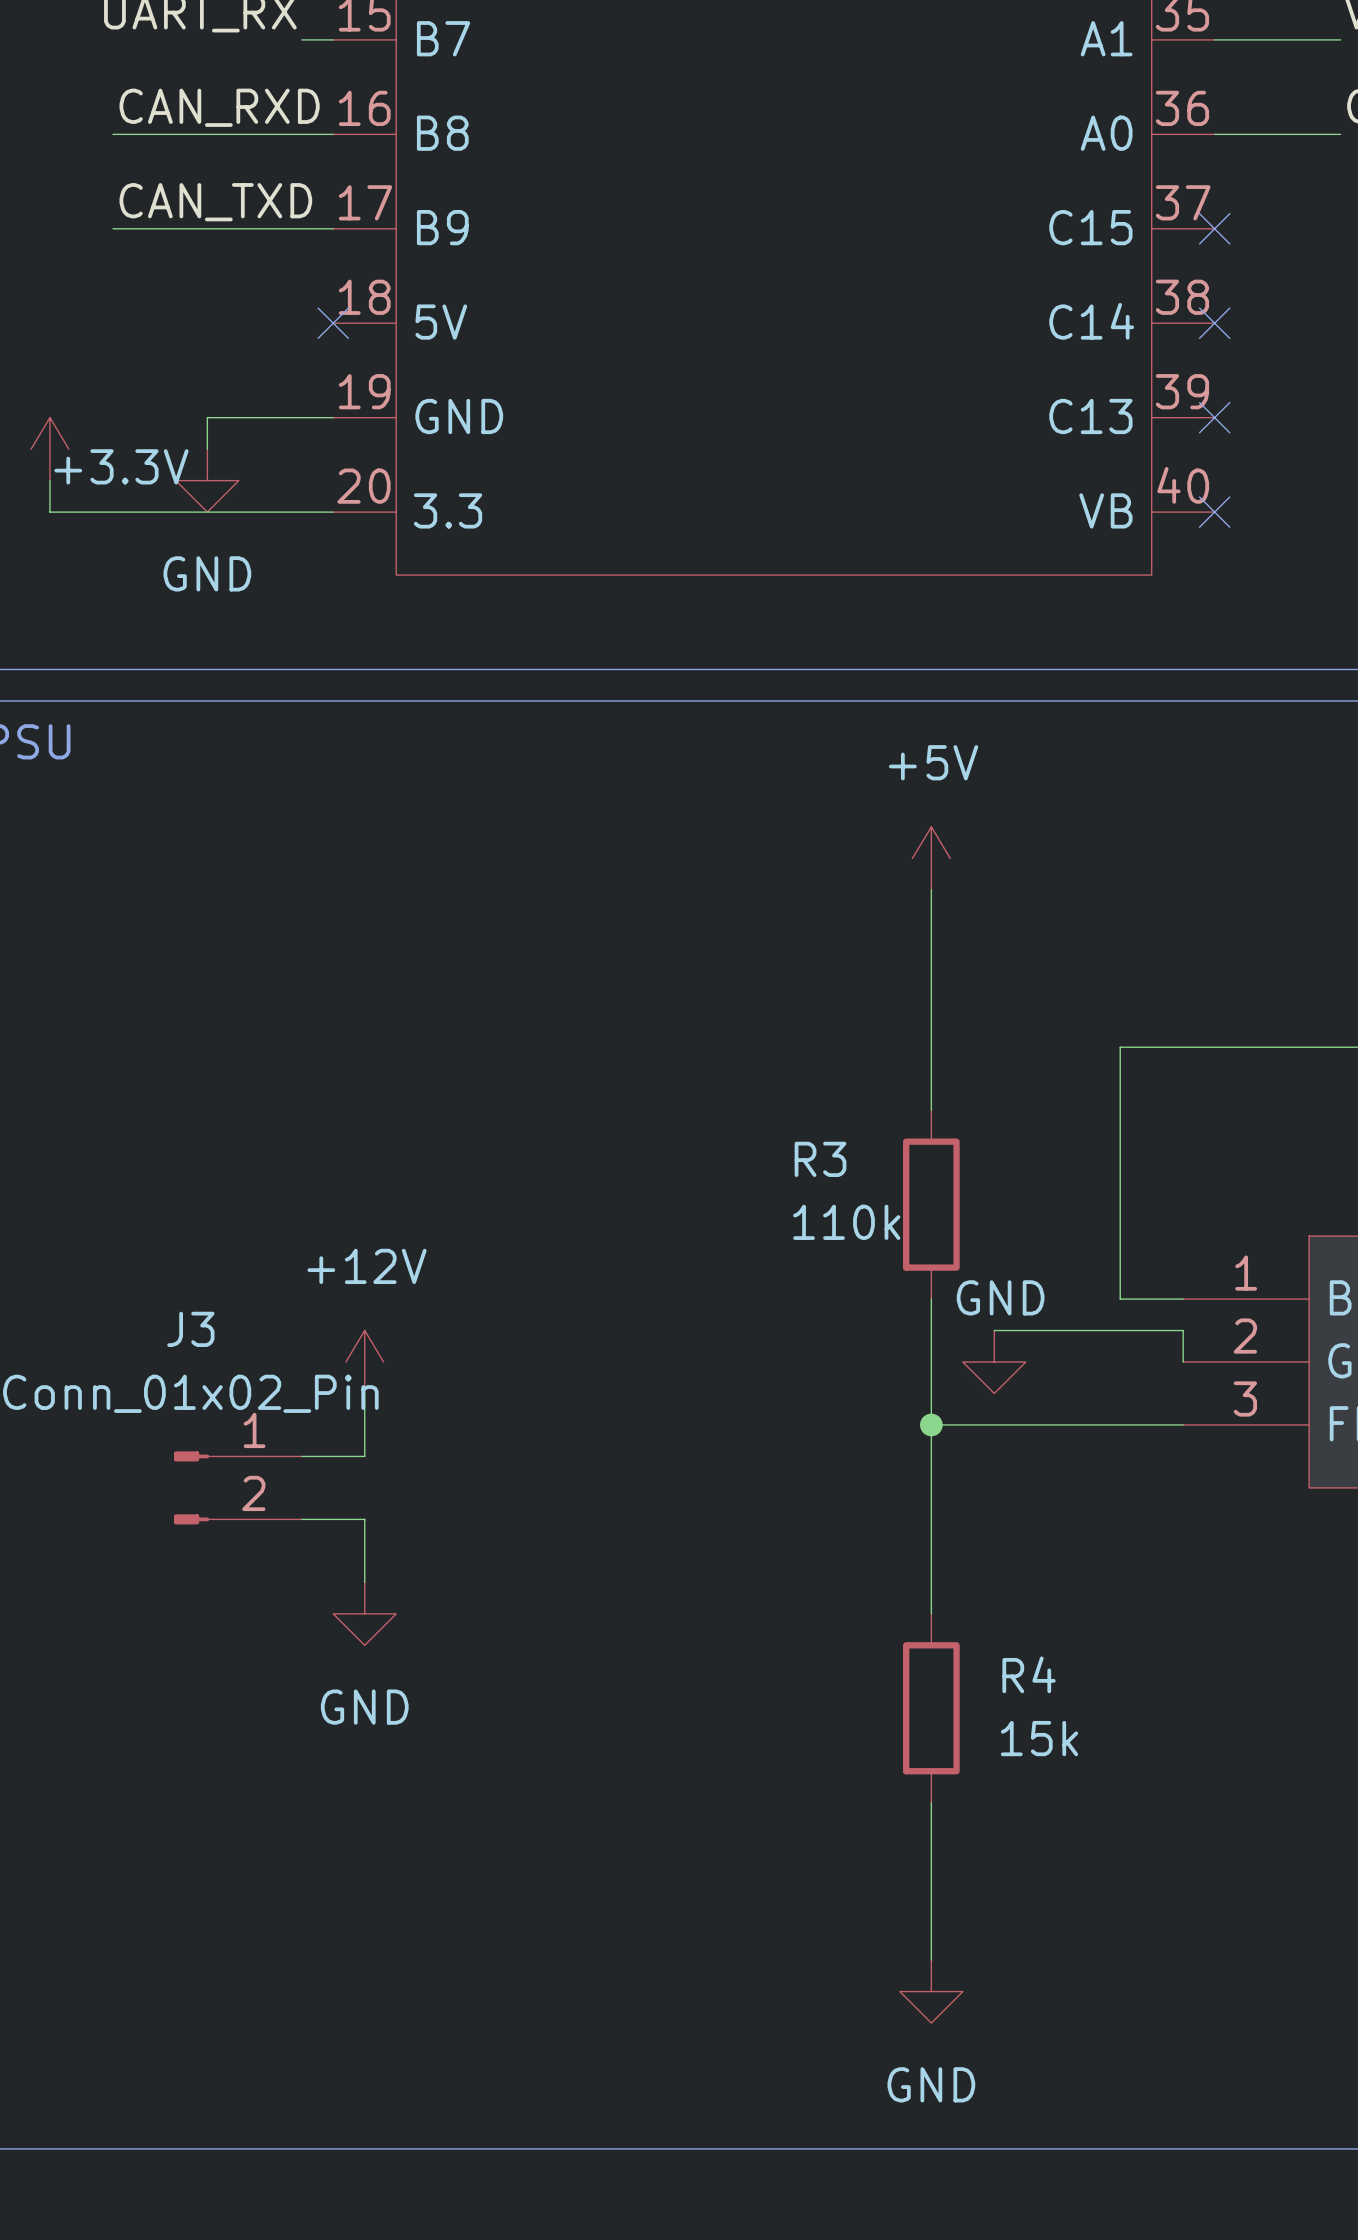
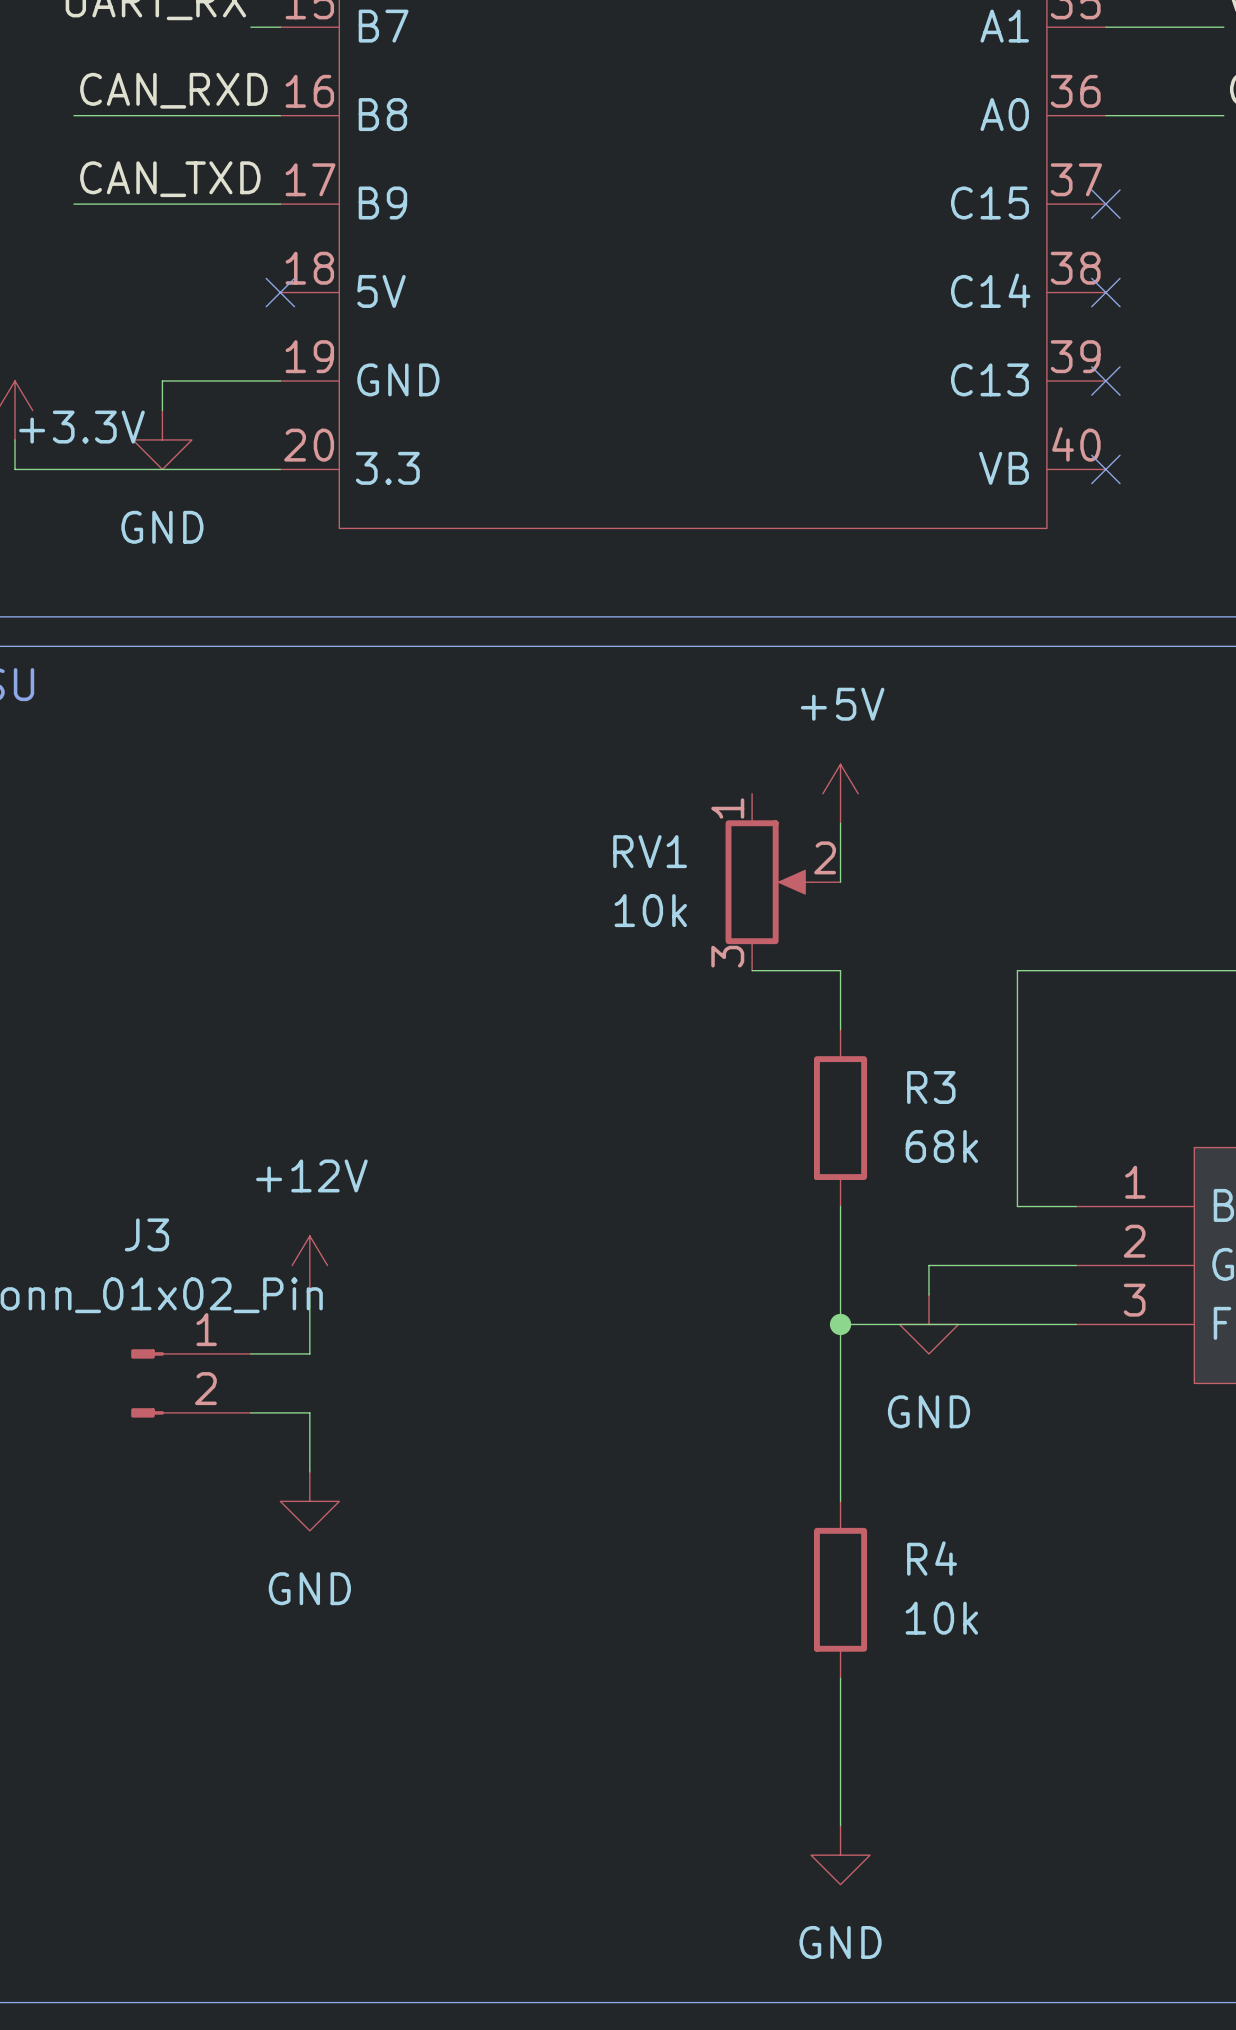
RV1: none -> 10k (783, 882)
wire: (931, 952) (931, 1047) -> (752, 970) (840, 970)
R3 name position: R3 (820, 1159) -> R3 (931, 1087)
R3 value: 110k (846, 1222) -> 68k (941, 1146)
power symbol text position: GND (1000, 1297) -> GND (928, 1411)
wire: (994, 1330) (1183, 1330) (1183, 1362) -> (928, 1294) (928, 1265) (1076, 1265)
power symbol position: GND (994, 1362) -> GND (928, 1324)
R4 value: 15k (1039, 1738) -> 10k (941, 1618)

